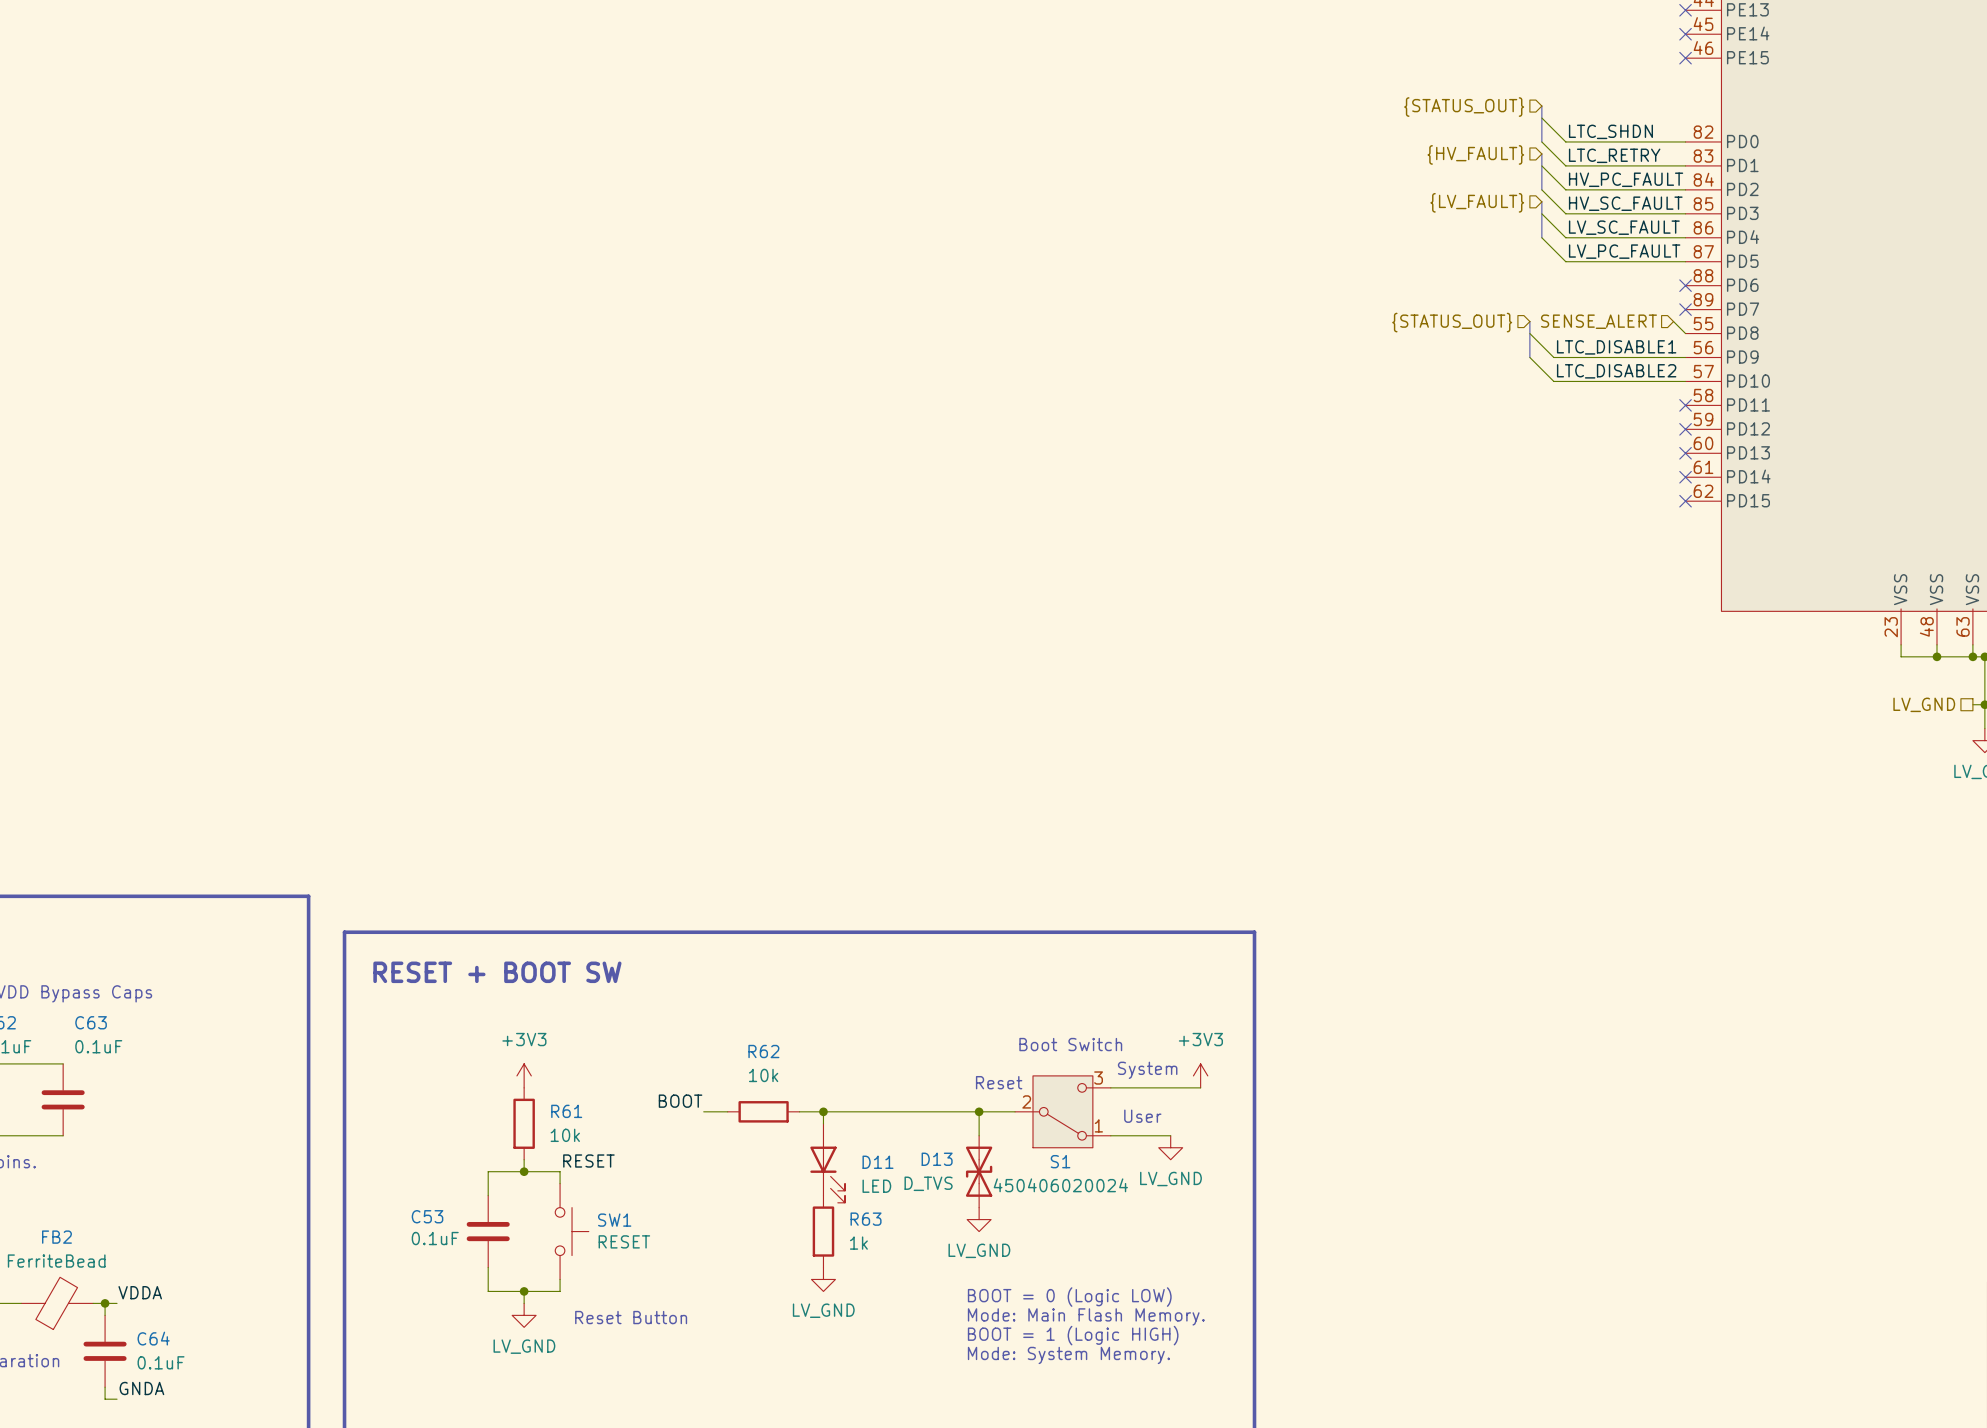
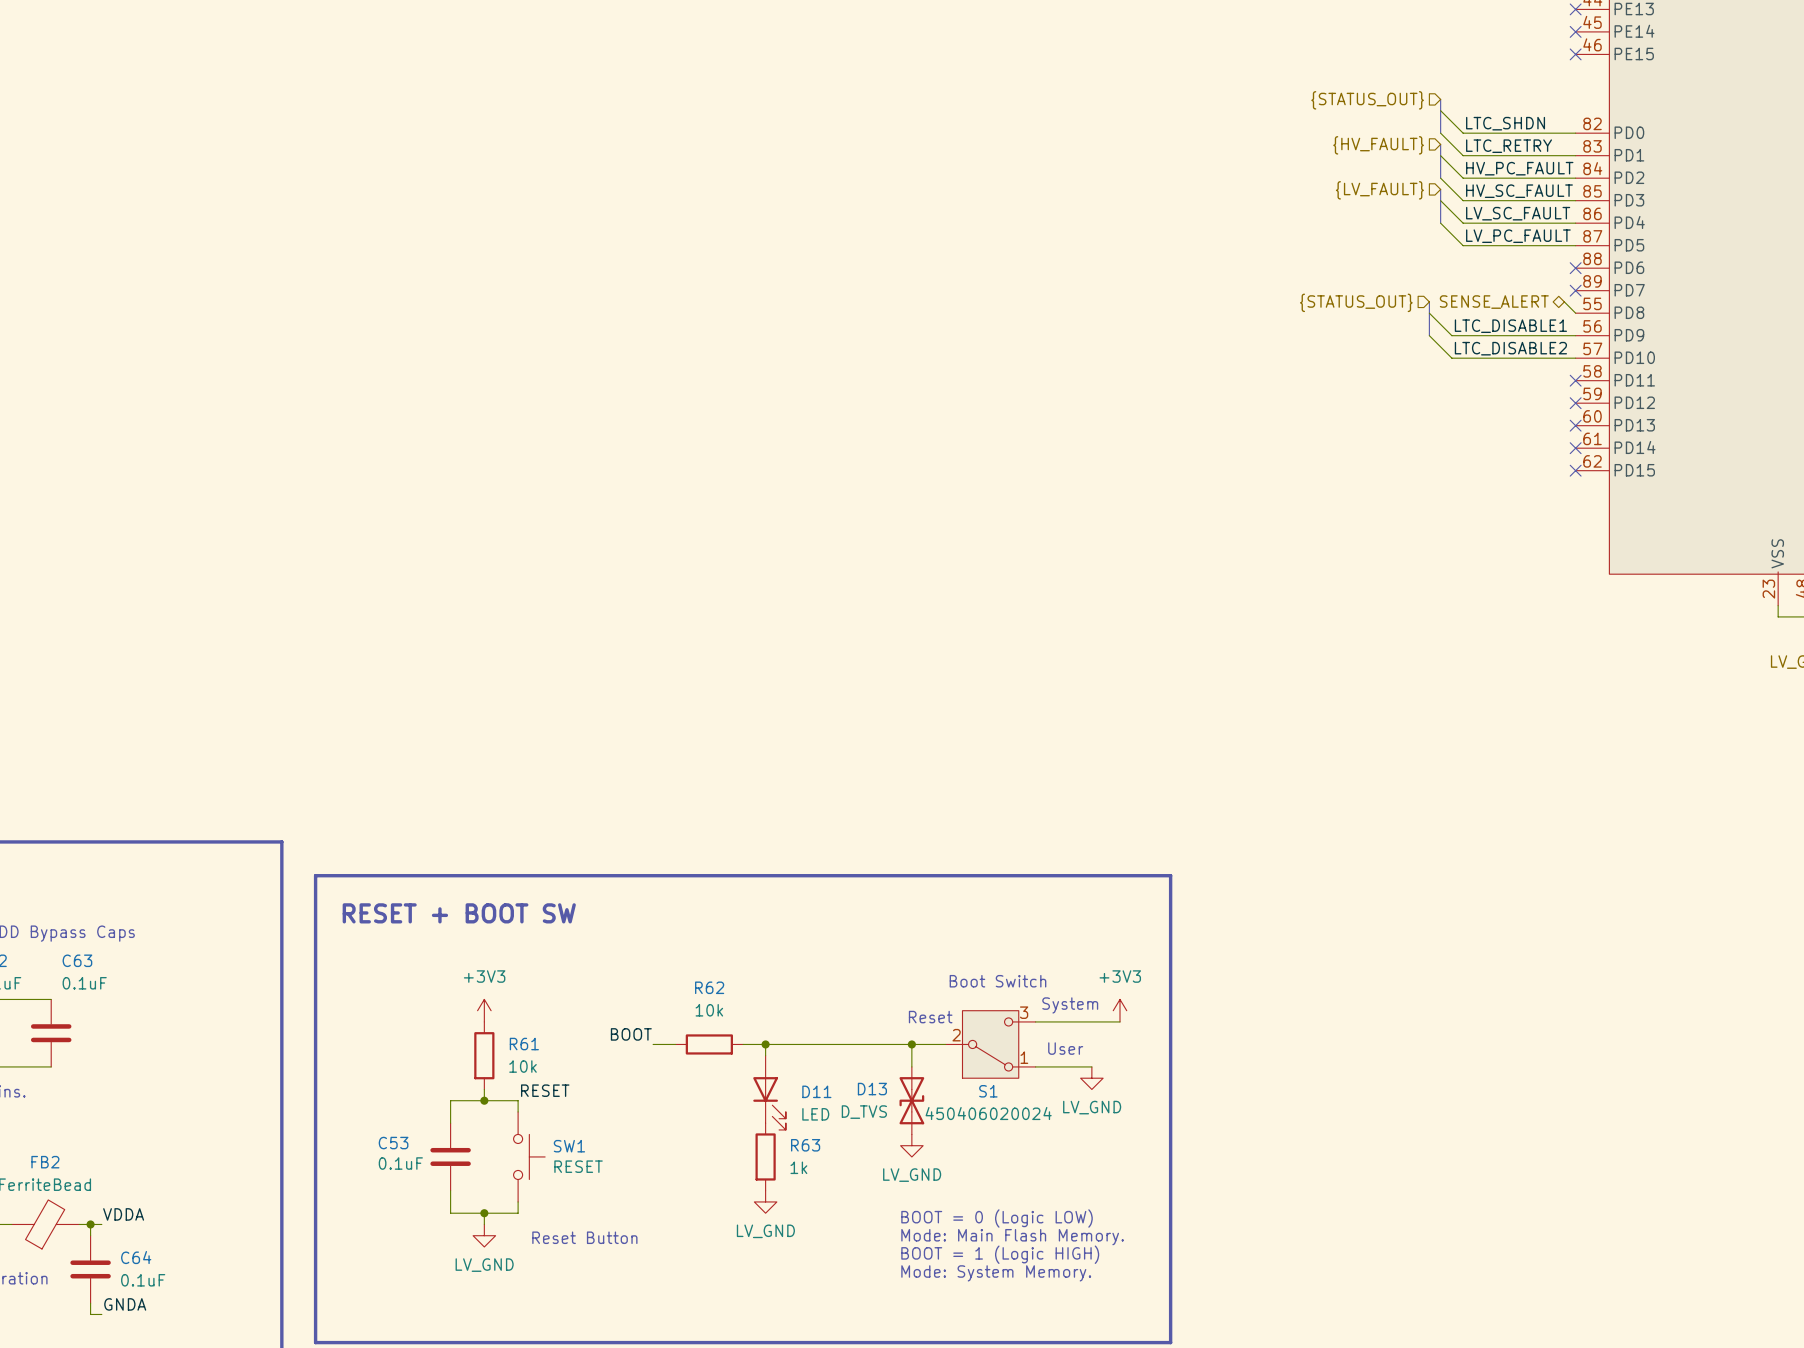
hierarchical label shape: input (1598, 321) -> bidirectional (1494, 302)

